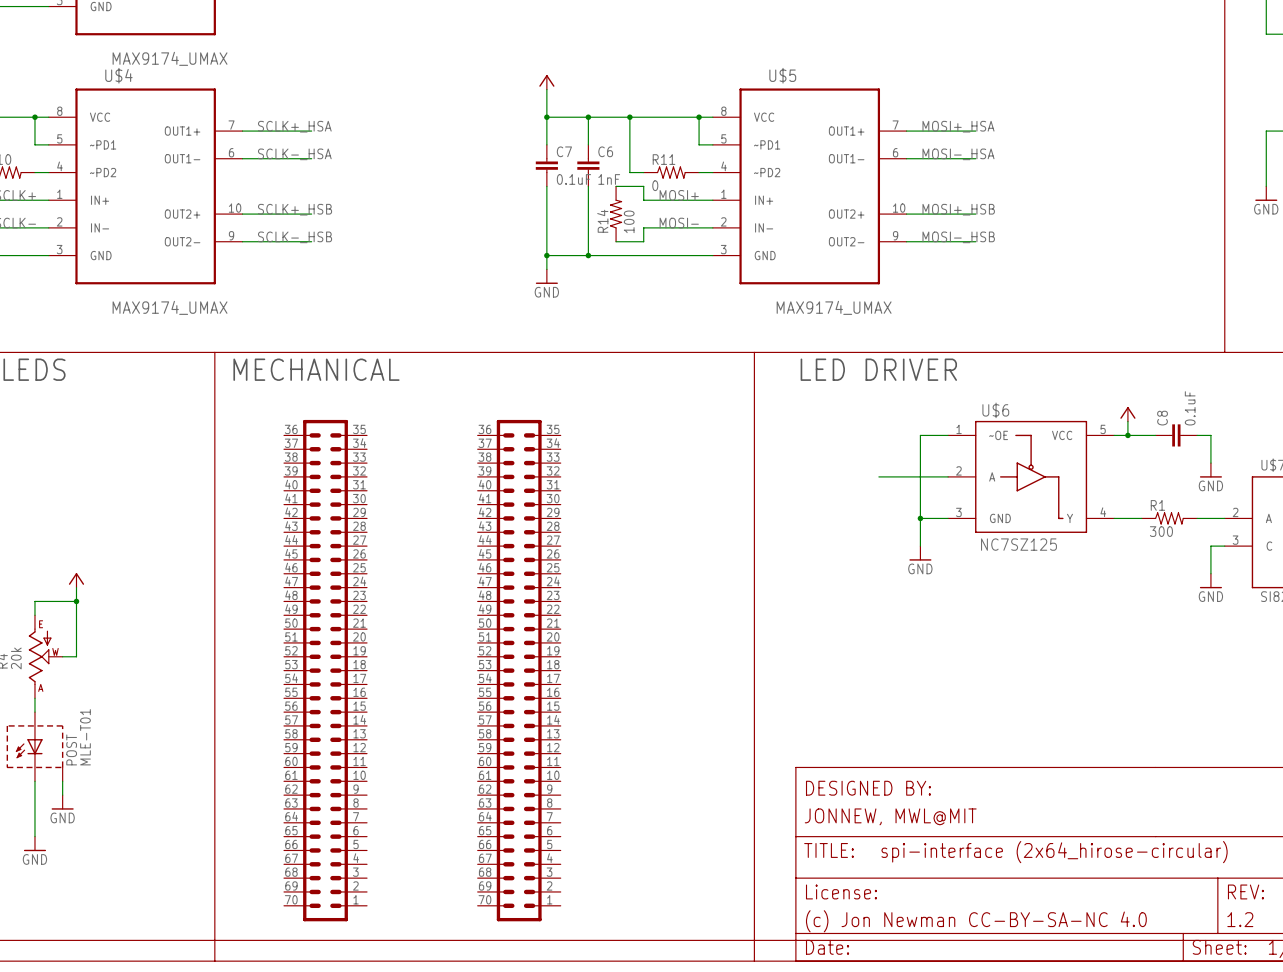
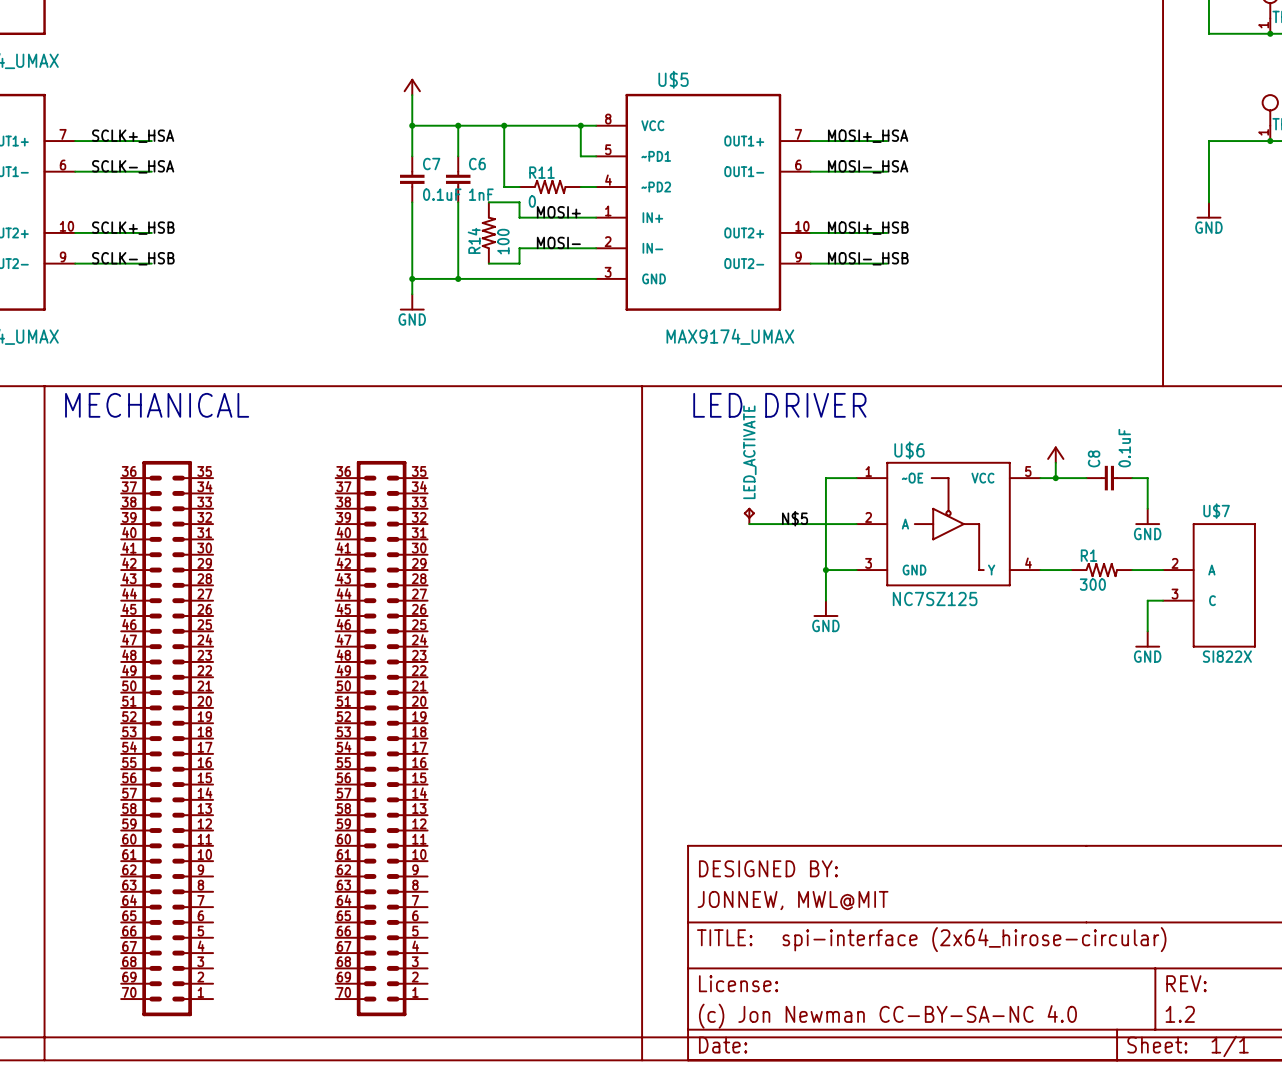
LED_ACTIVATE: none -> (749, 516)
label: none -> N$5 (795, 518)
wire: none -> (749, 524) (779, 524)

